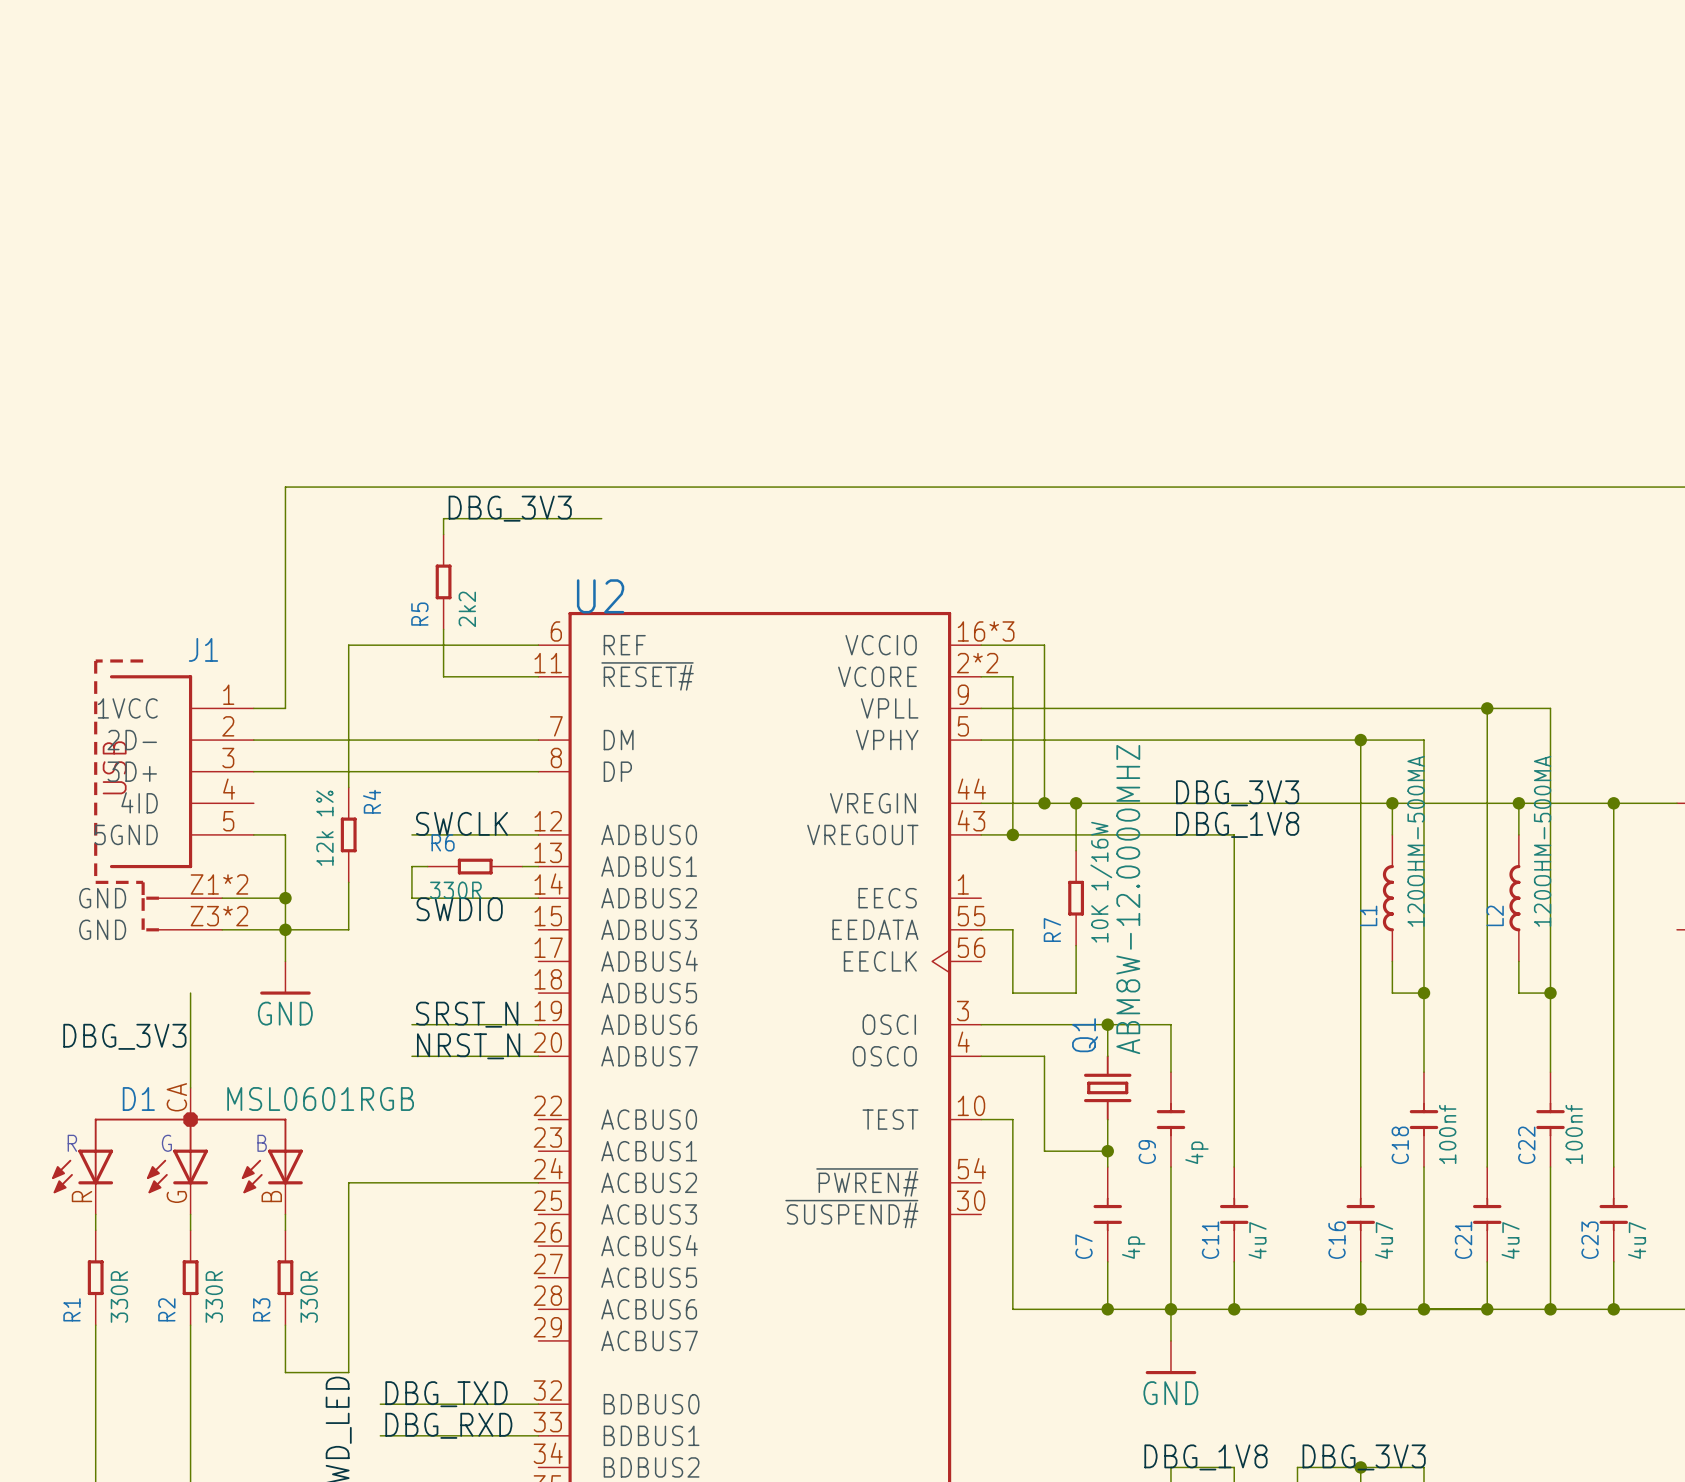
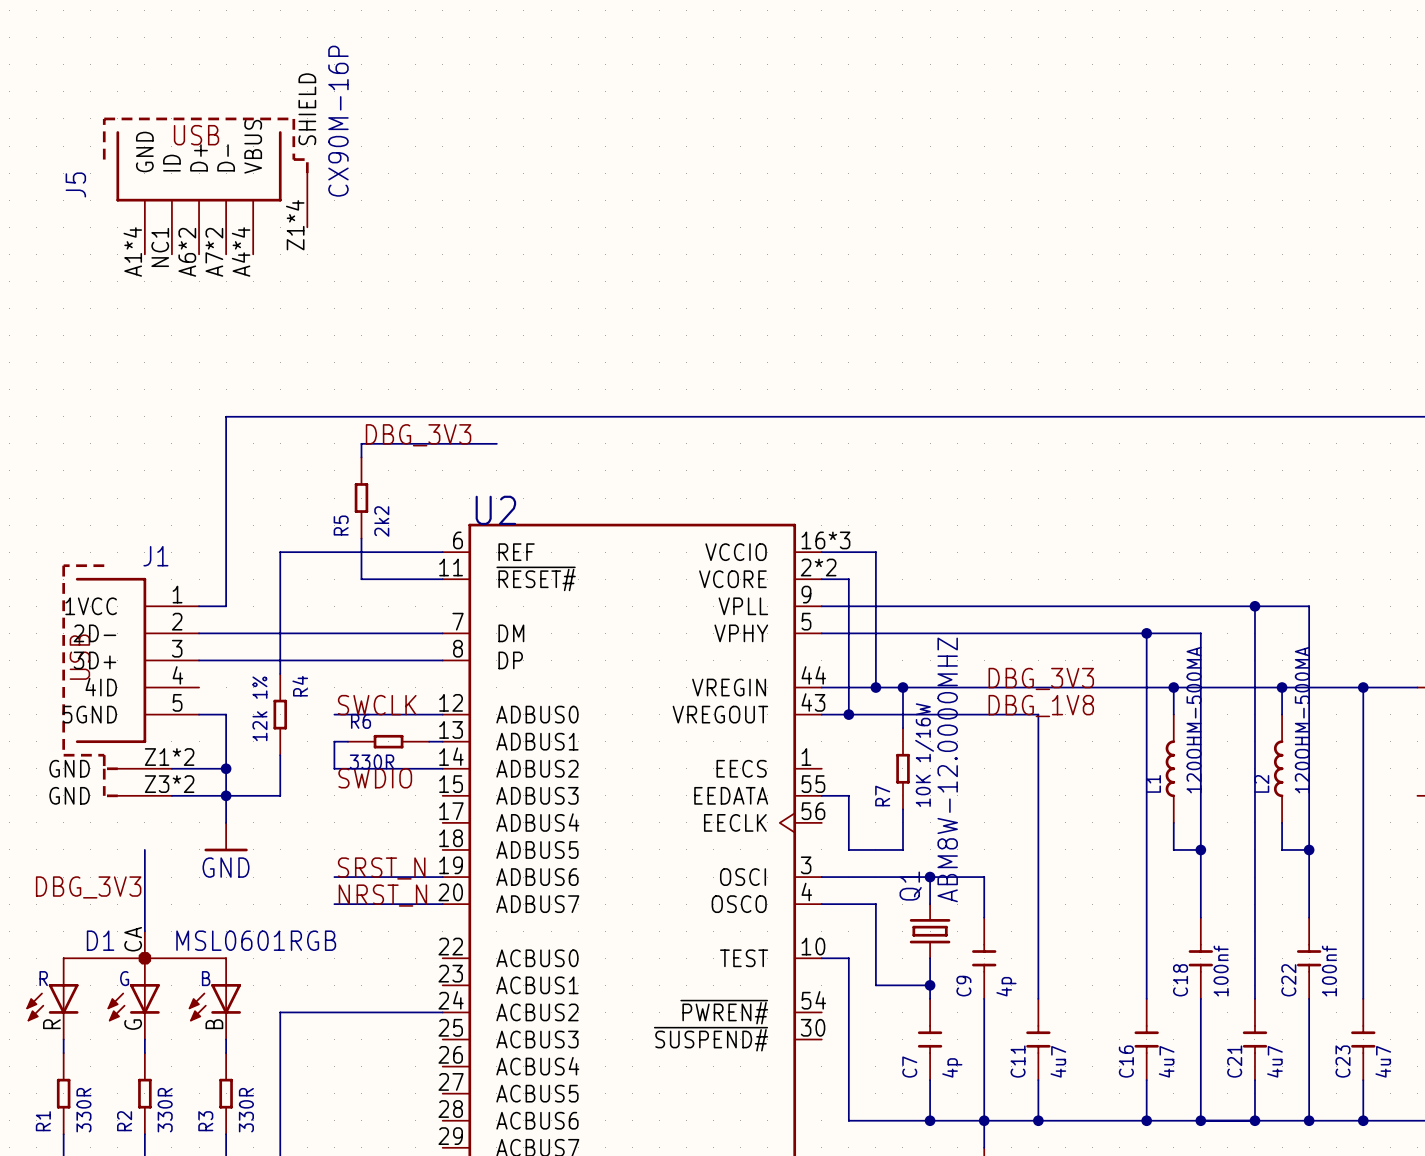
J5: none -> CX90M-16P (205, 185)

